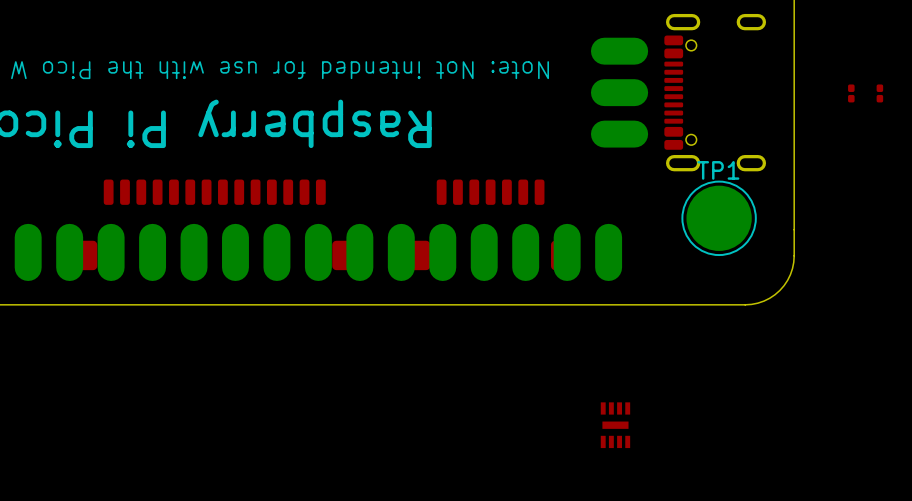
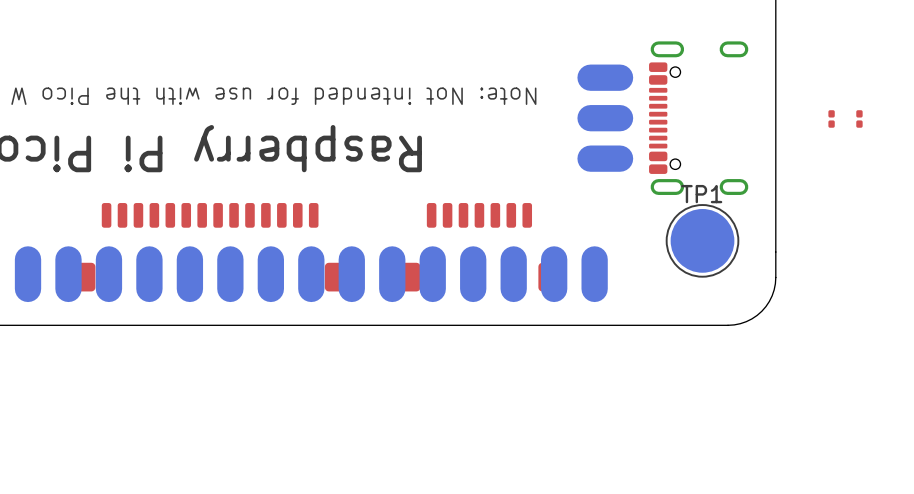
part: (615, 425) -> none

